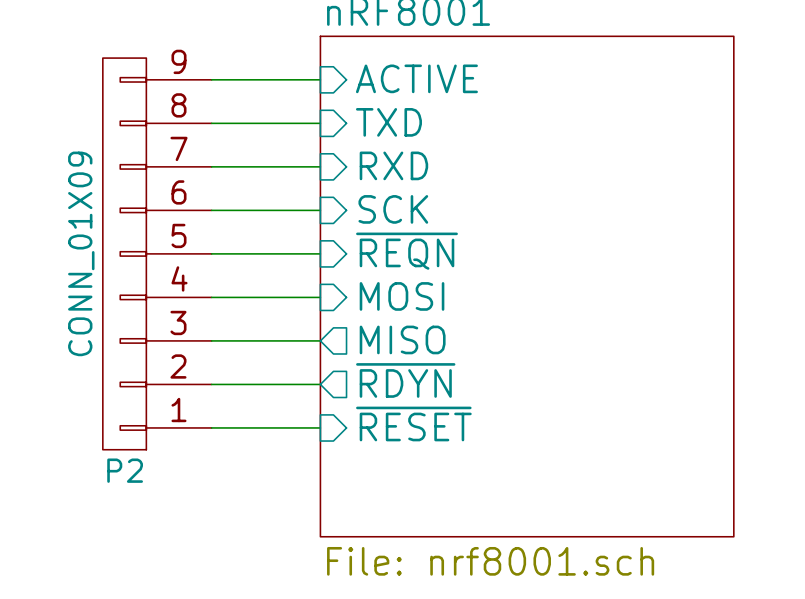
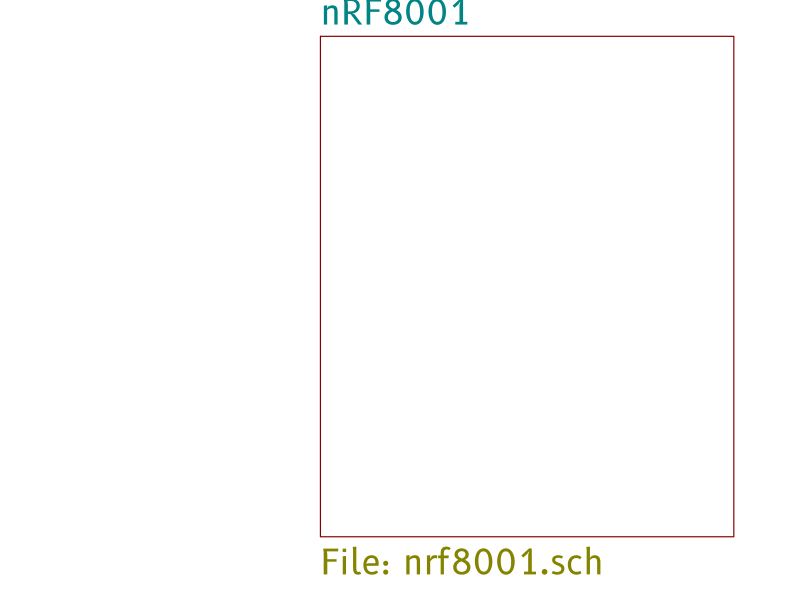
sheet pin: ACTIVE (416, 78) -> none
wire: (211, 79) (320, 79) -> none
sheet pin: TXD (388, 122) -> none
wire: (211, 123) (320, 123) -> none
sheet pin: RXD (393, 165) -> none
wire: (211, 166) (320, 166) -> none
sheet pin: SCK (393, 209) -> none
wire: (211, 210) (320, 210) -> none
sheet pin: ~{REQN} (406, 251) -> none
P2: CONN_01X09 (157, 253) -> none
wire: (211, 253) (320, 253) -> none
sheet pin: MOSI (402, 296) -> none
wire: (211, 297) (320, 297) -> none
sheet pin: MISO (402, 339) -> none
wire: (211, 340) (320, 340) -> none
sheet pin: ~{RDYN} (405, 380) -> none
wire: (211, 384) (320, 384) -> none
sheet pin: ~{RESET} (413, 423) -> none
wire: (211, 427) (320, 427) -> none

